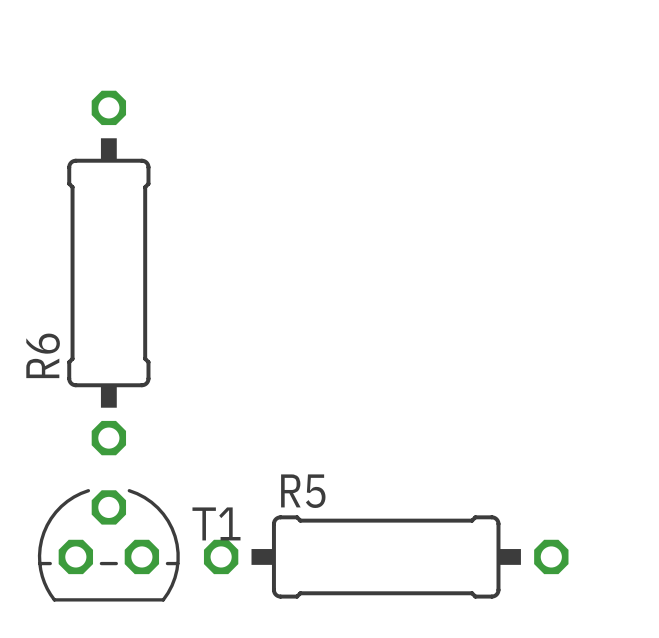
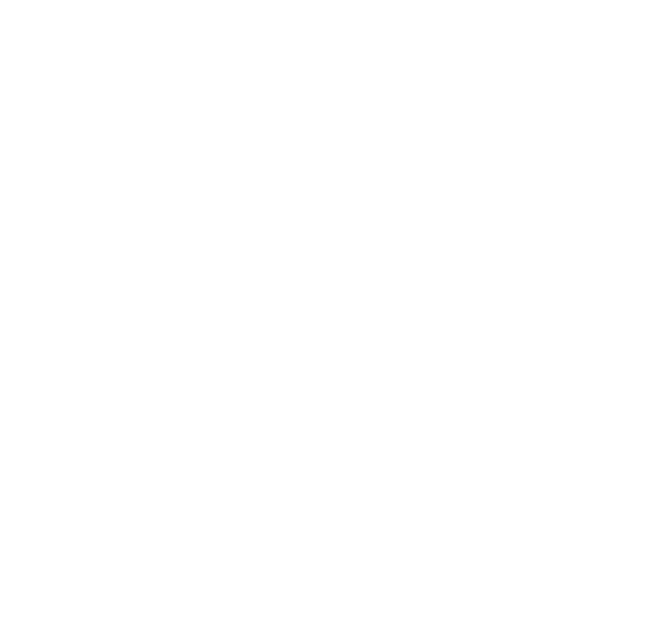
R6: (108, 272) -> none
T1: (108, 545) -> none
R5: (386, 556) -> none

